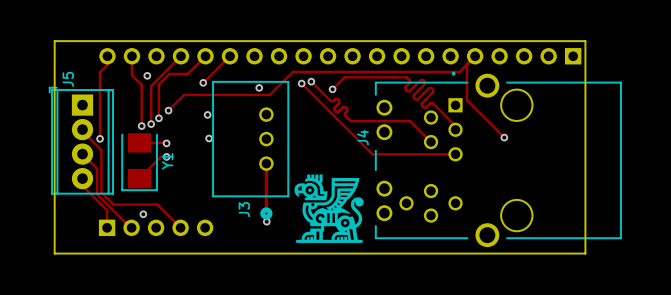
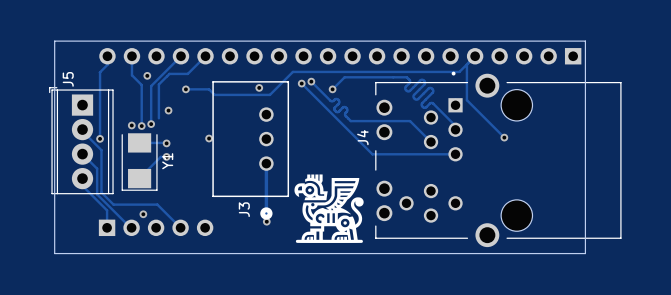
track: (230, 56) (203, 82) -> none
via: (203, 82) -> none
via: none -> (185, 89)
track: (214, 94) (184, 94) (168, 110) -> (214, 94) (209, 89) (185, 89)
via: (207, 114) -> none
via: (158, 118) -> none
via: none -> (131, 125)

